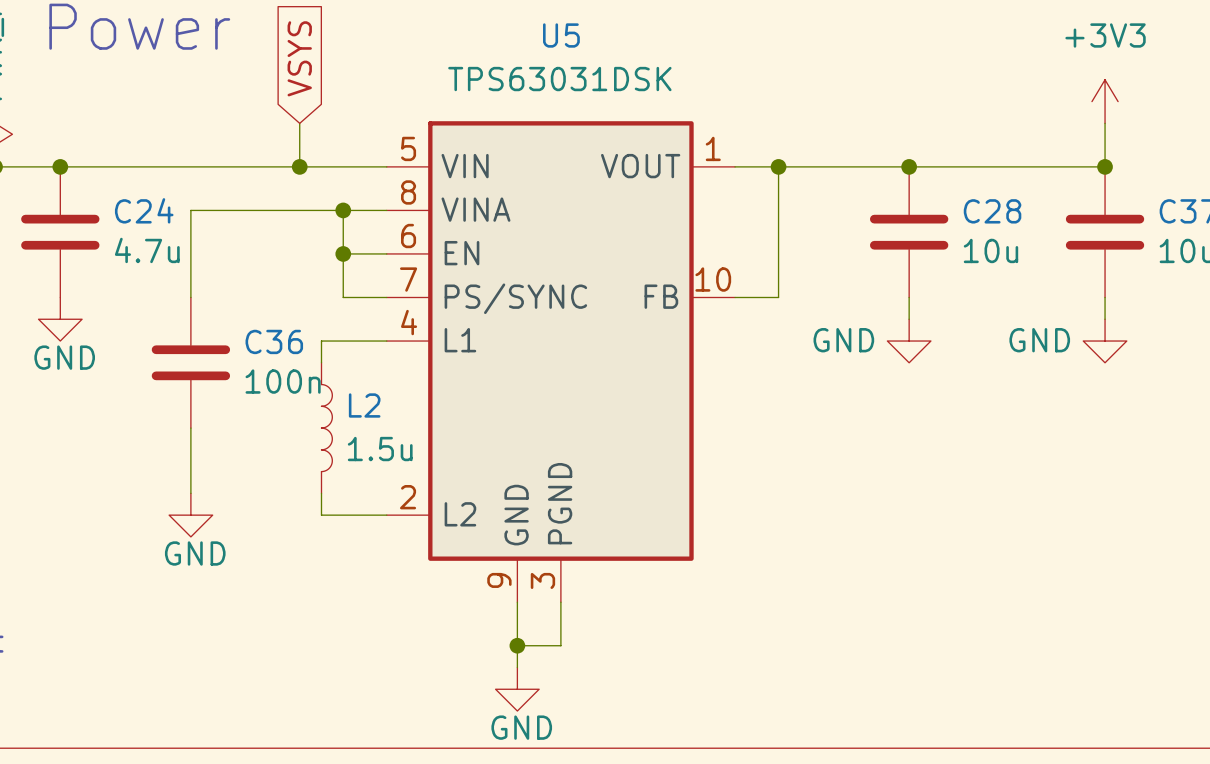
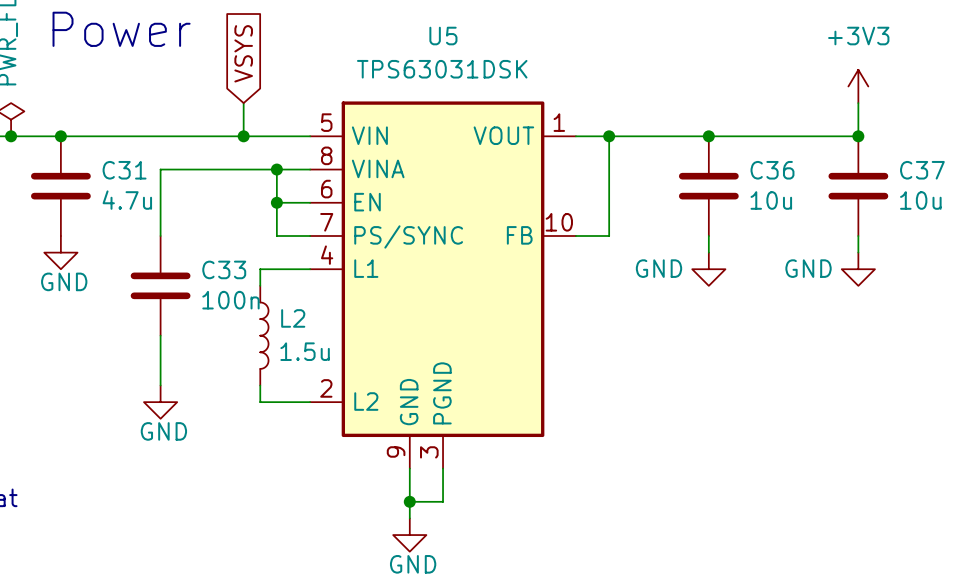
C24 name: C24 (144, 210) -> C31 (124, 170)
C28 name: C28 (992, 211) -> C36 (772, 170)
C36 name: C36 (274, 341) -> C33 (224, 269)

